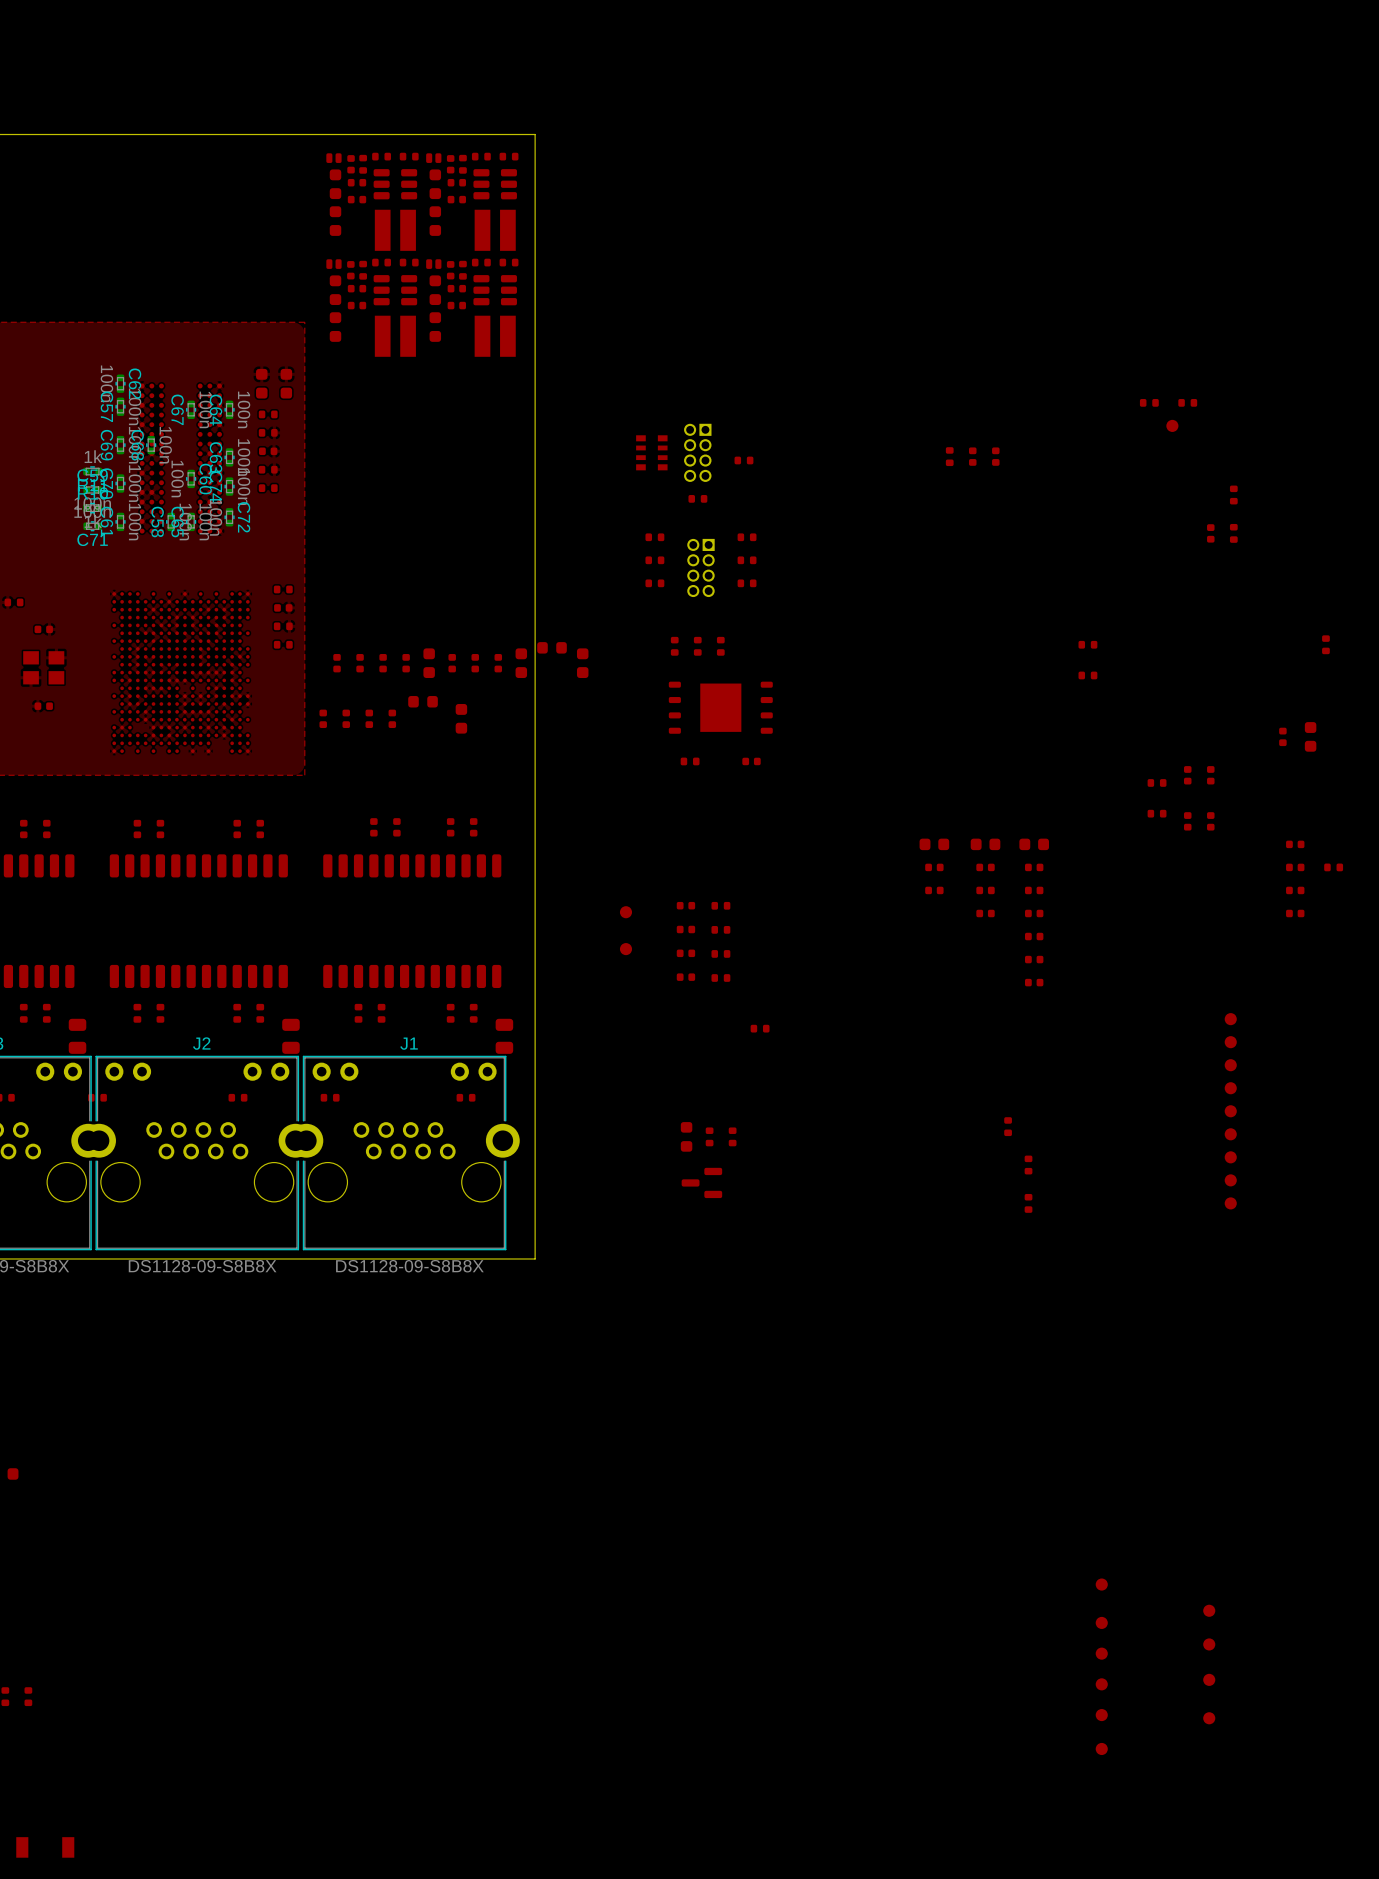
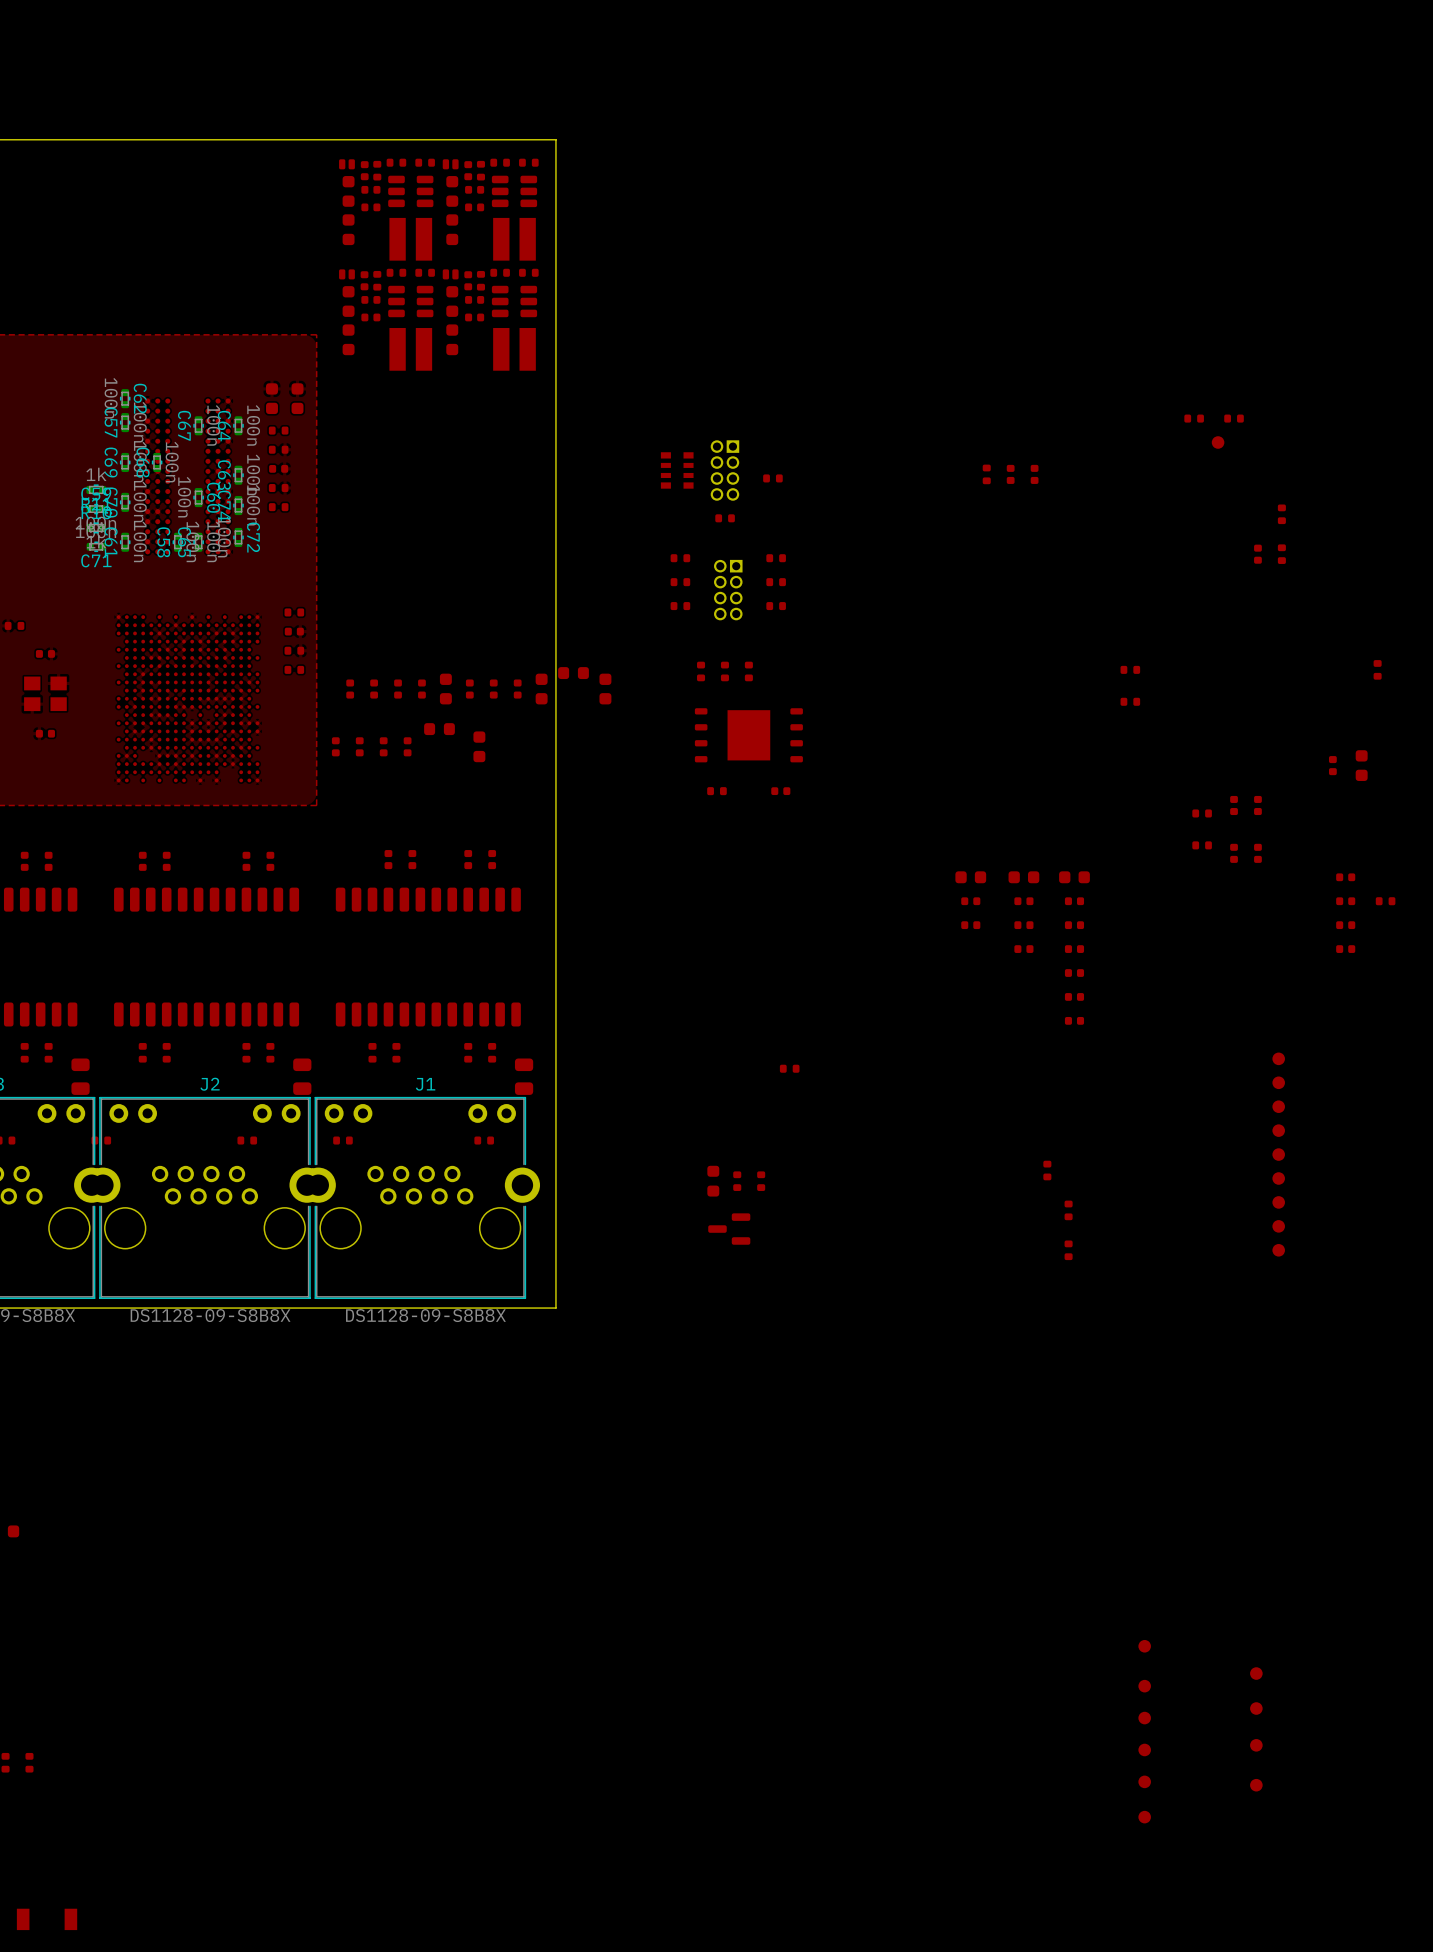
part: (685, 905) -> none
part: (720, 905) -> none
part: (625, 912) -> none
part: (685, 929) -> none
part: (720, 929) -> none
part: (625, 949) -> none
part: (685, 953) -> none
part: (720, 953) -> none
part: (685, 977) -> none
part: (720, 977) -> none

